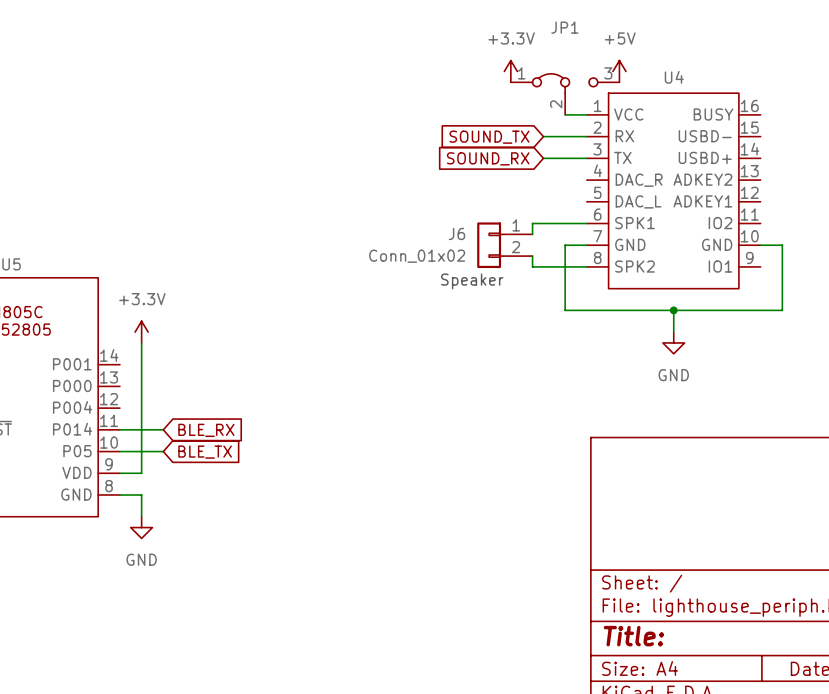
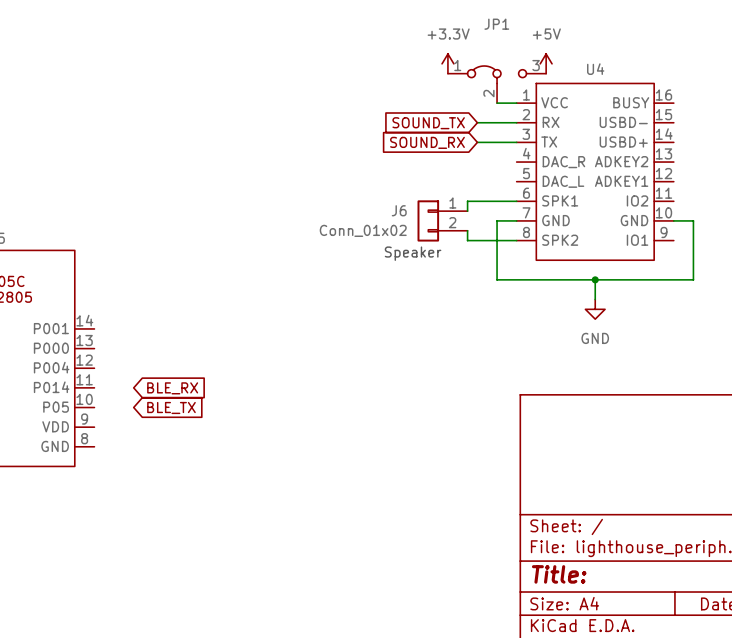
power symbol: +3.3V (141, 332) -> none
wire: (141, 342) (141, 473) (119, 473) -> none
wire: (119, 429) (163, 429) -> none
wire: (119, 451) (163, 451) -> none
wire: (119, 495) (141, 495) (141, 516) -> none
power symbol: GND (141, 527) -> none

